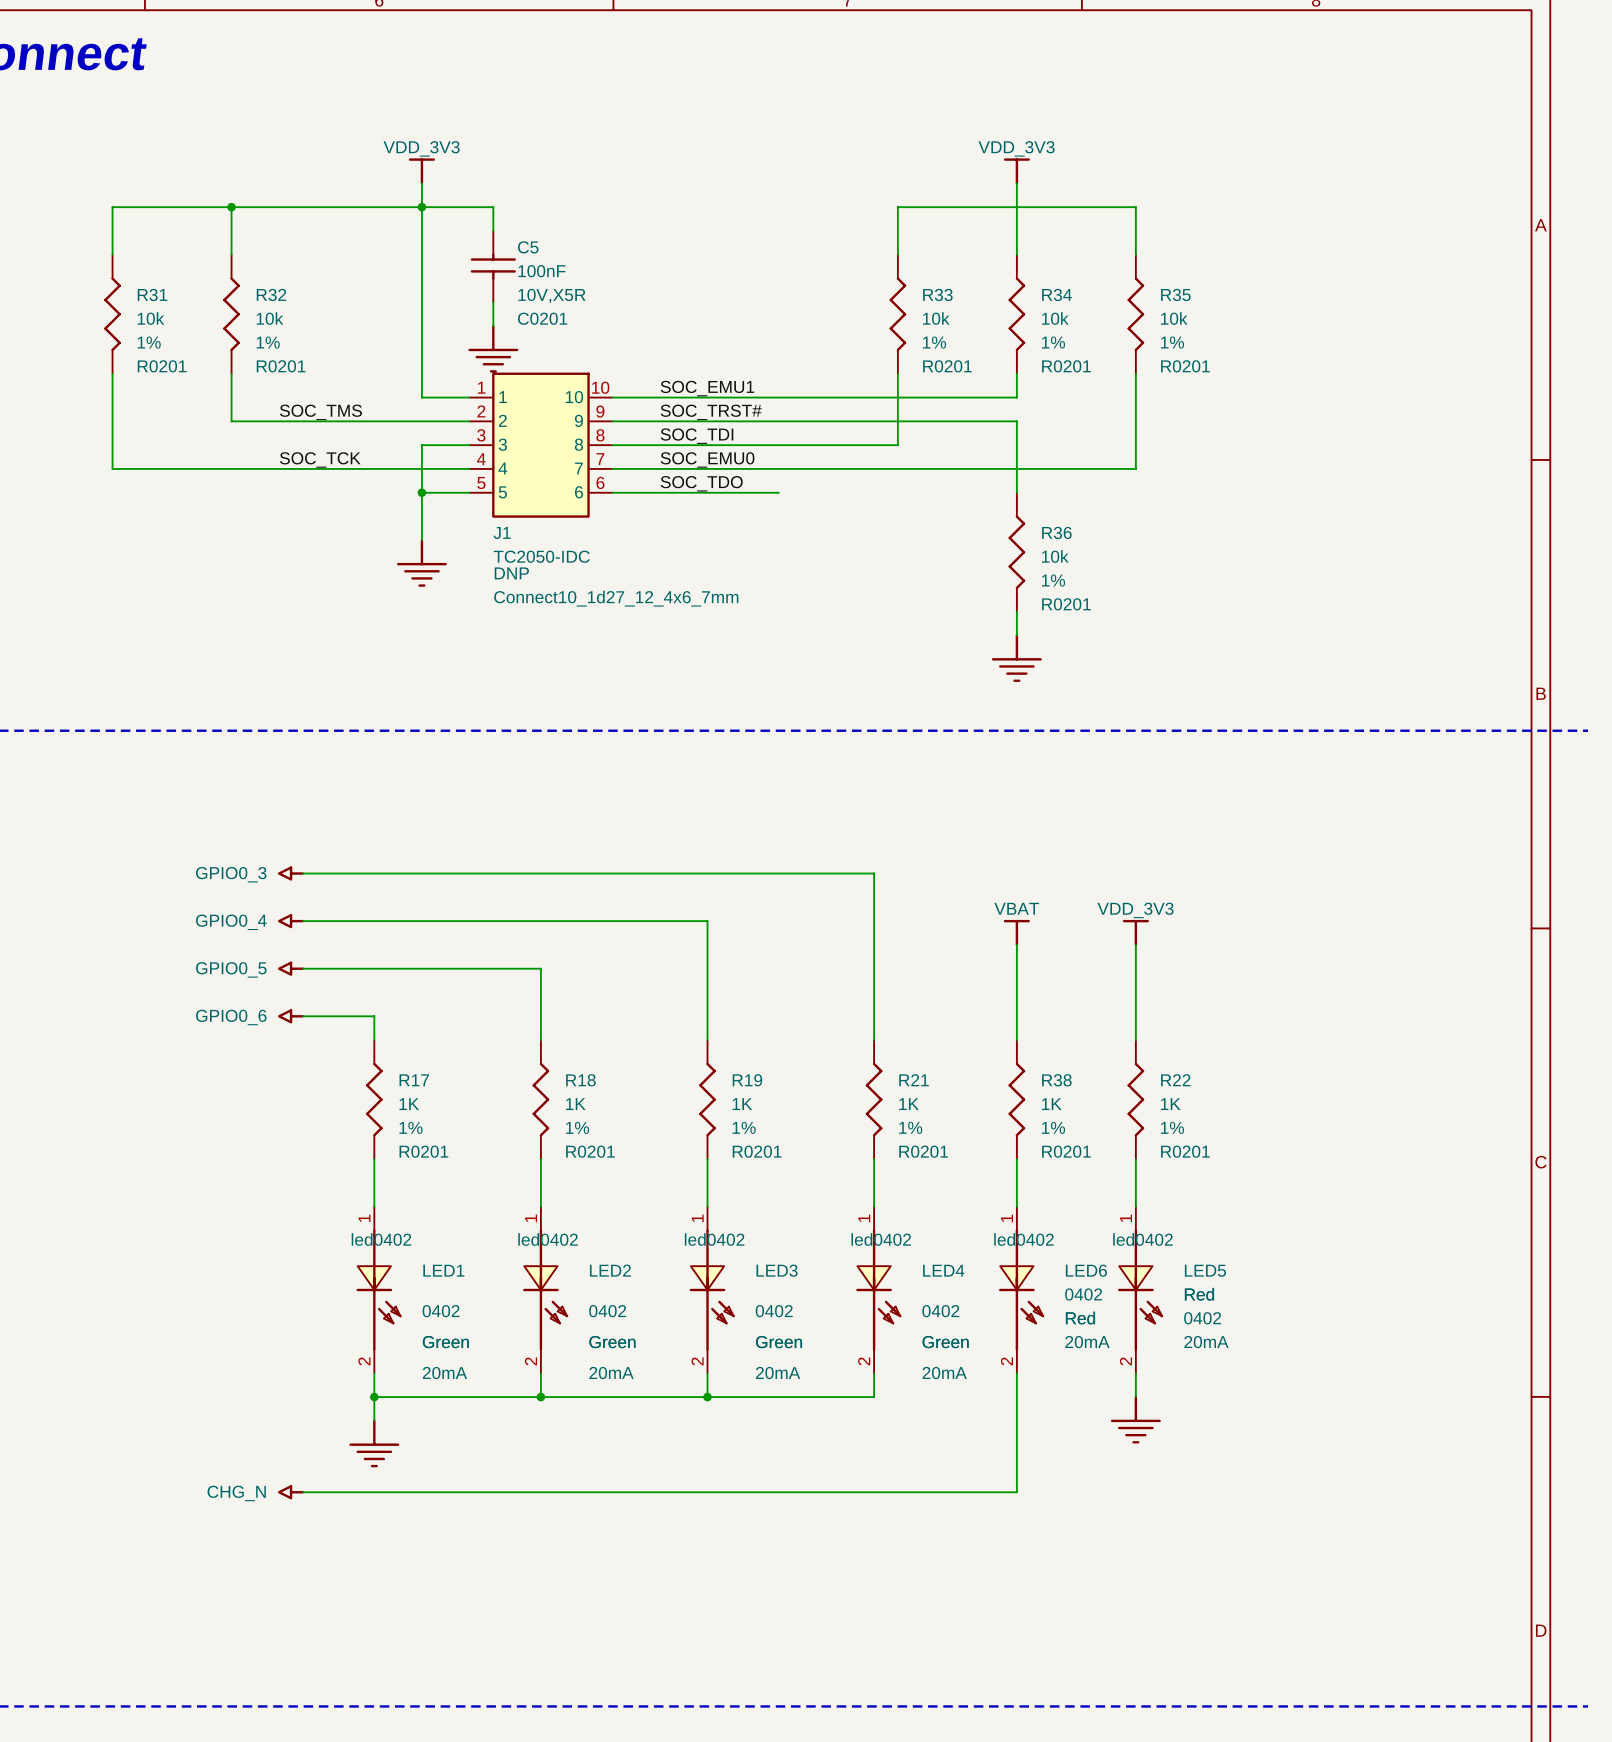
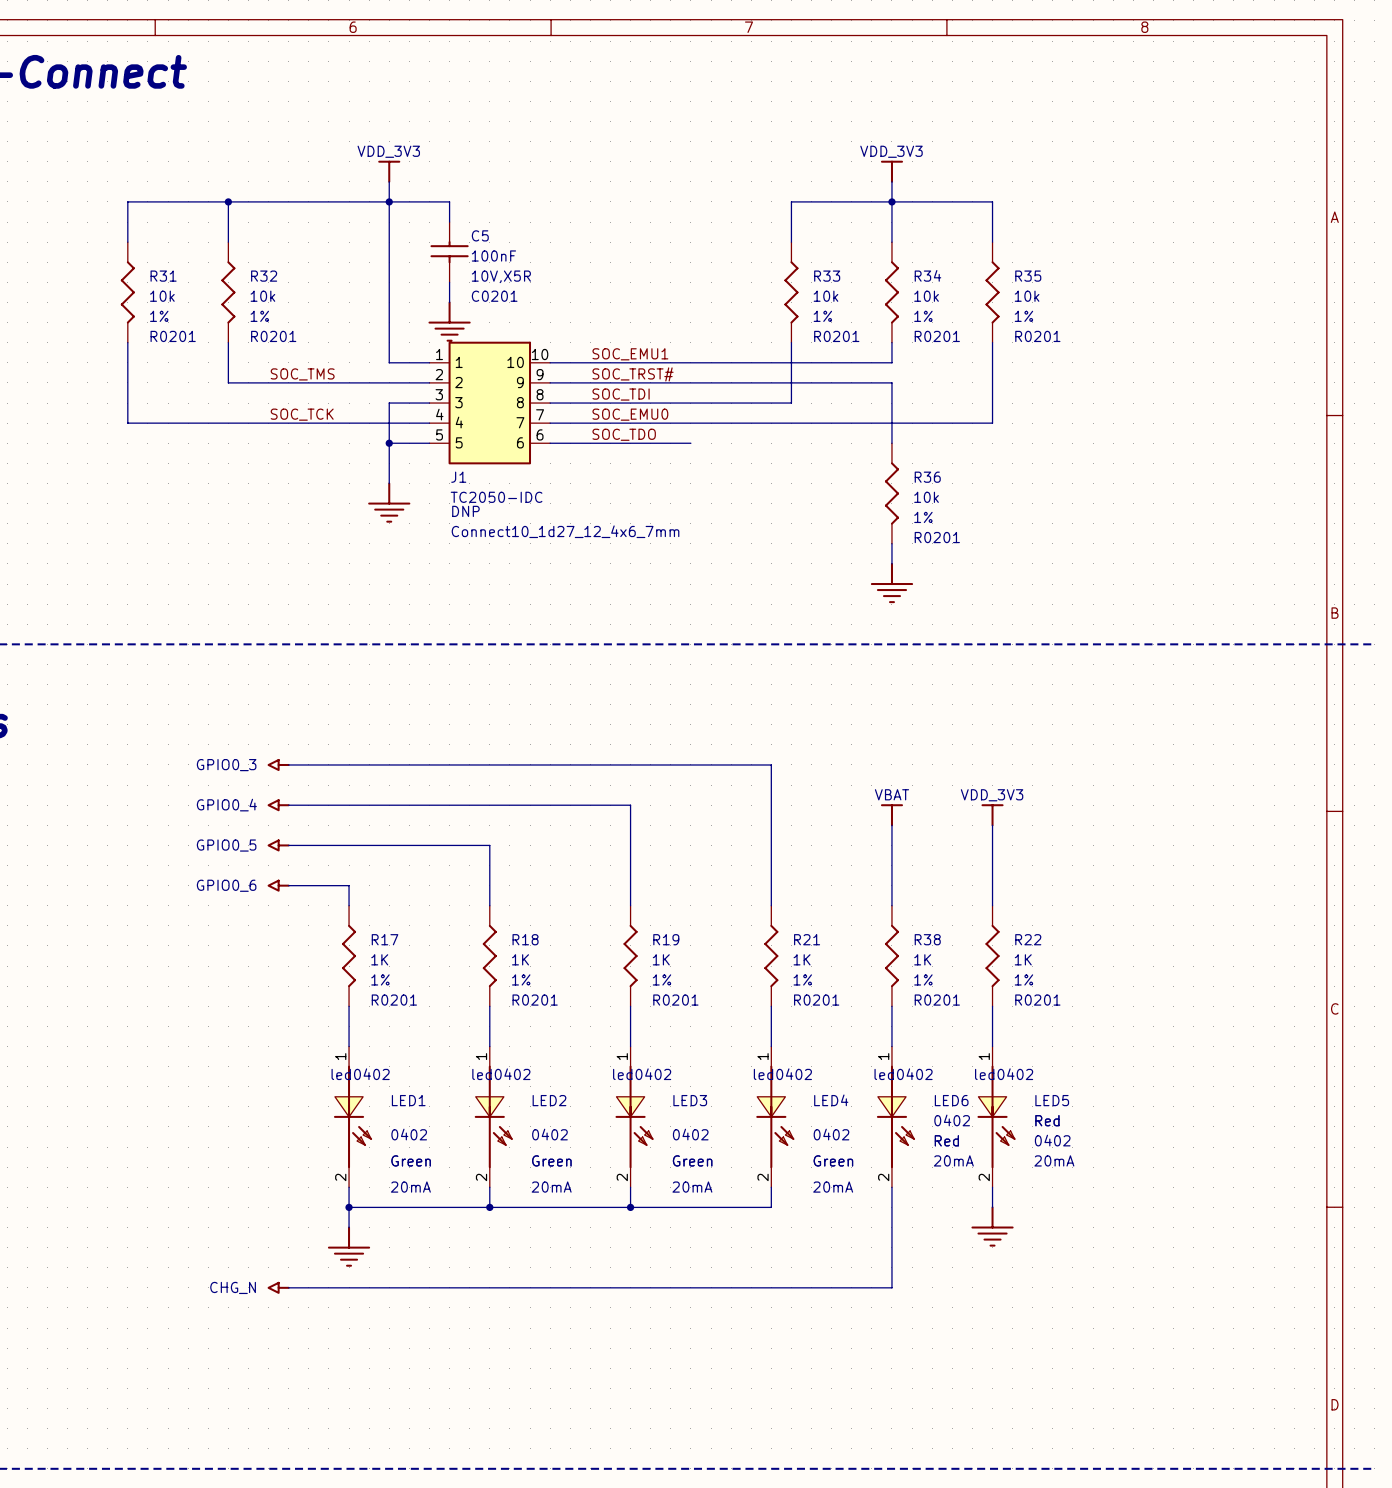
junction: none -> (891, 201)

